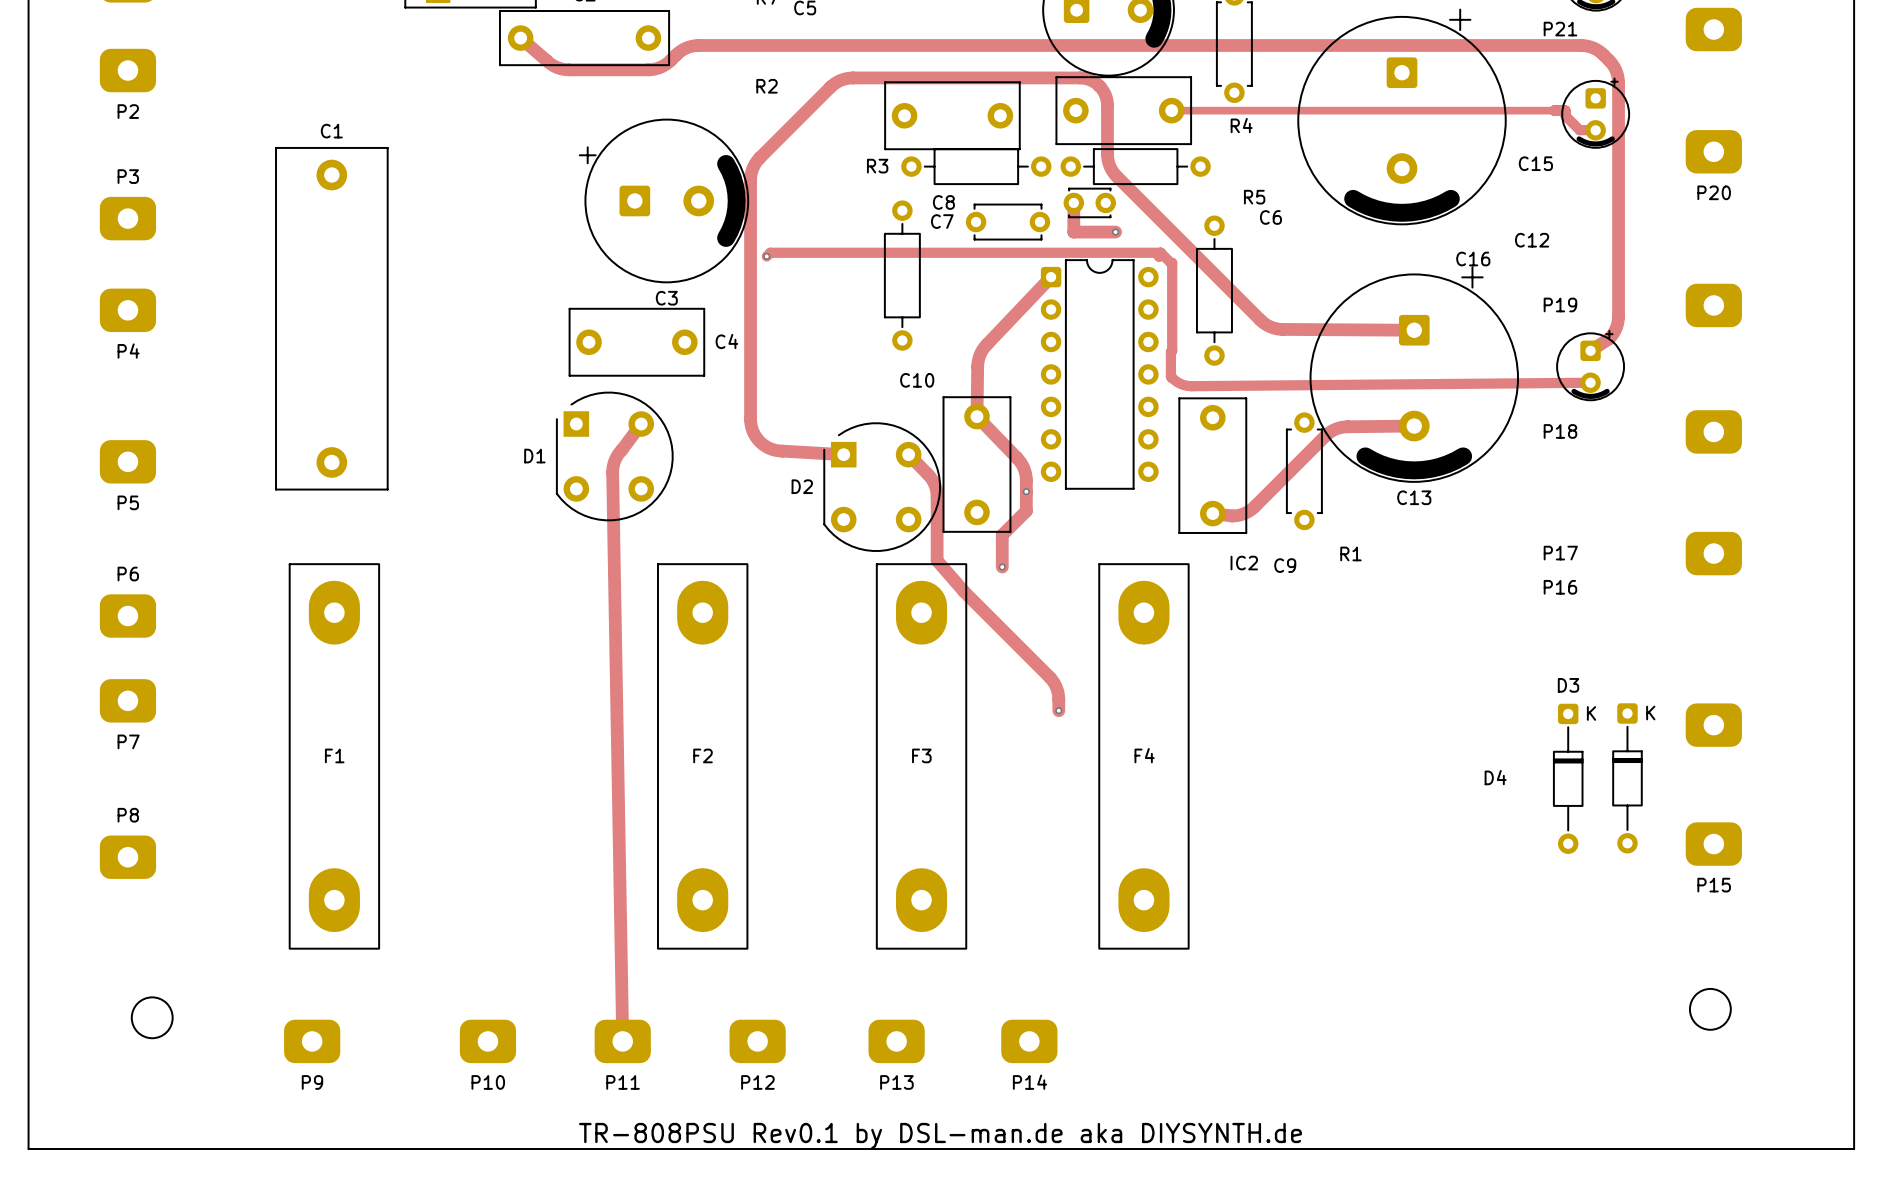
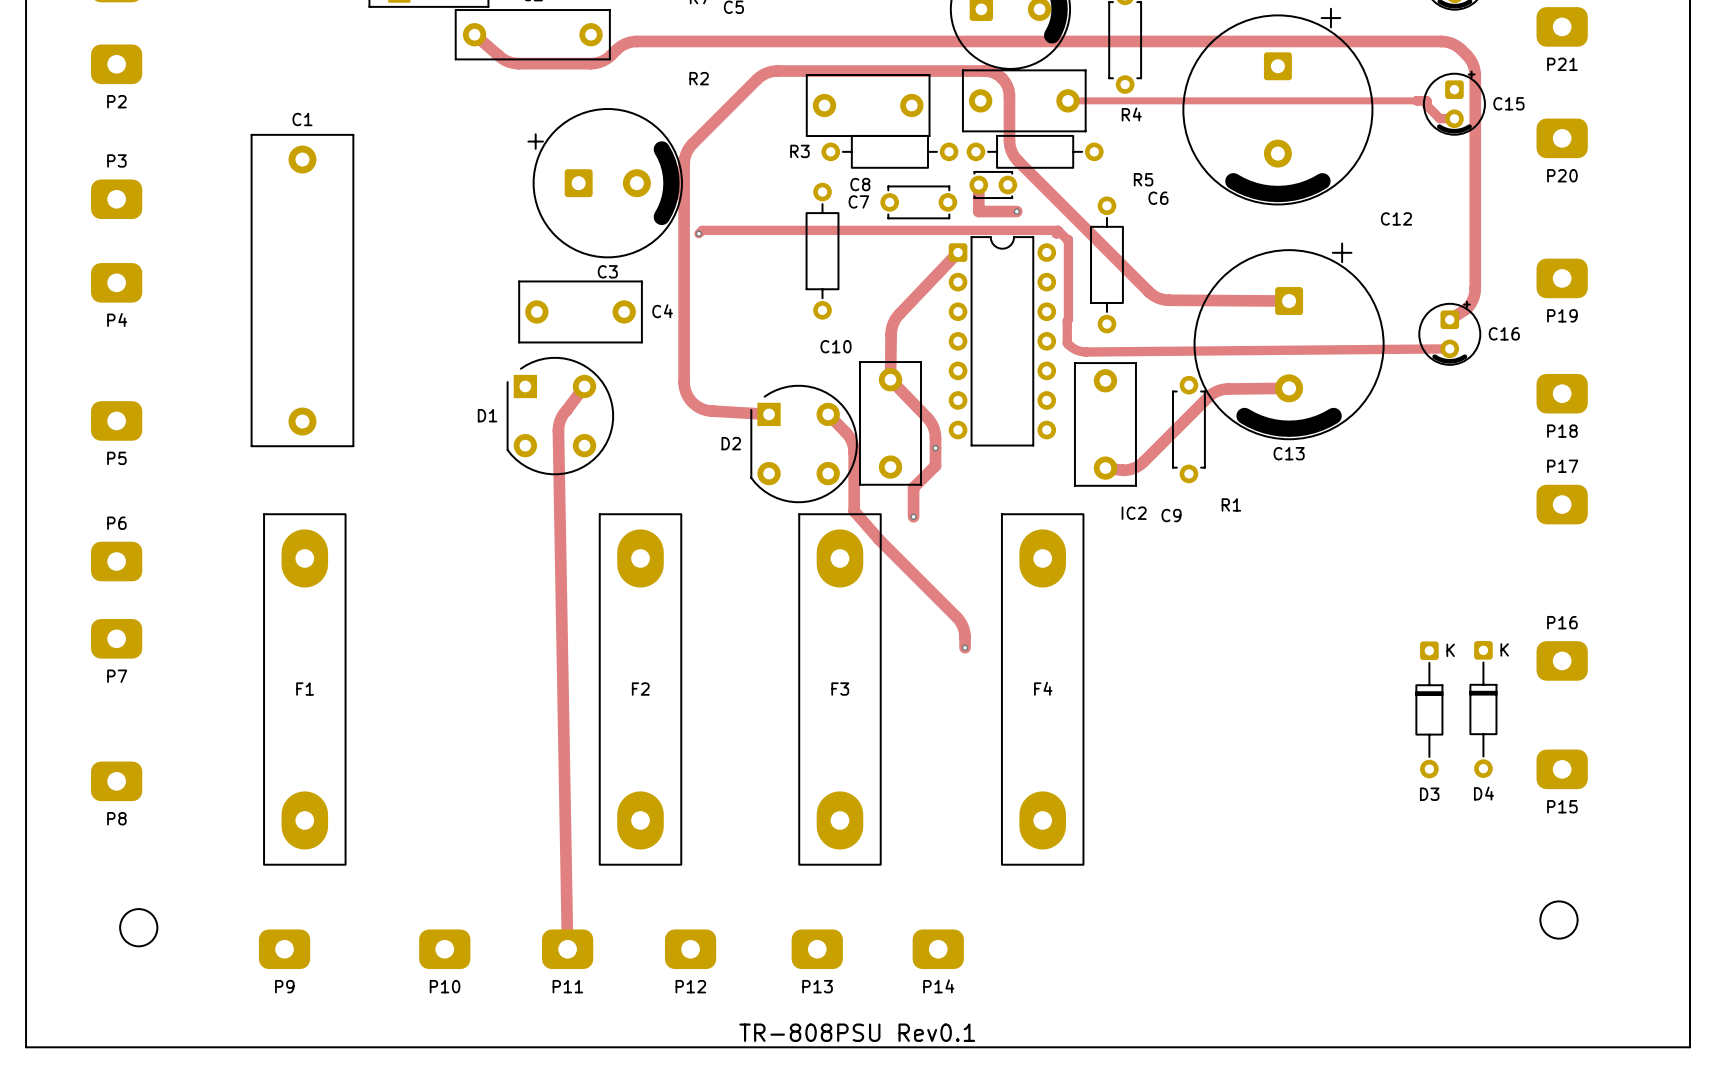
P21 name position: P21 (1560, 29) -> P21 (1562, 64)
C15 name position: C15 (1535, 163) -> C15 (1508, 103)
C16 name position: C16 (1473, 258) -> C16 (1504, 333)
P19 name position: P19 (1560, 304) -> P19 (1562, 315)
P18 name position: P18 (1560, 431) -> P18 (1562, 431)
P17 name position: P17 (1560, 553) -> P17 (1562, 466)
P16 name position: P16 (1560, 587) -> P16 (1562, 622)
D3 name position: D3 (1568, 685) -> D3 (1429, 794)
D4 name position: D4 (1495, 777) -> D4 (1483, 793)
P8 name position: P8 (128, 815) -> P8 (116, 818)
text: TR-808PSU Rev0.1 by DSL-man.de aka DIYSYNTH.de (940, 1135) -> TR-808PSU Rev0.1 (857, 1032)

